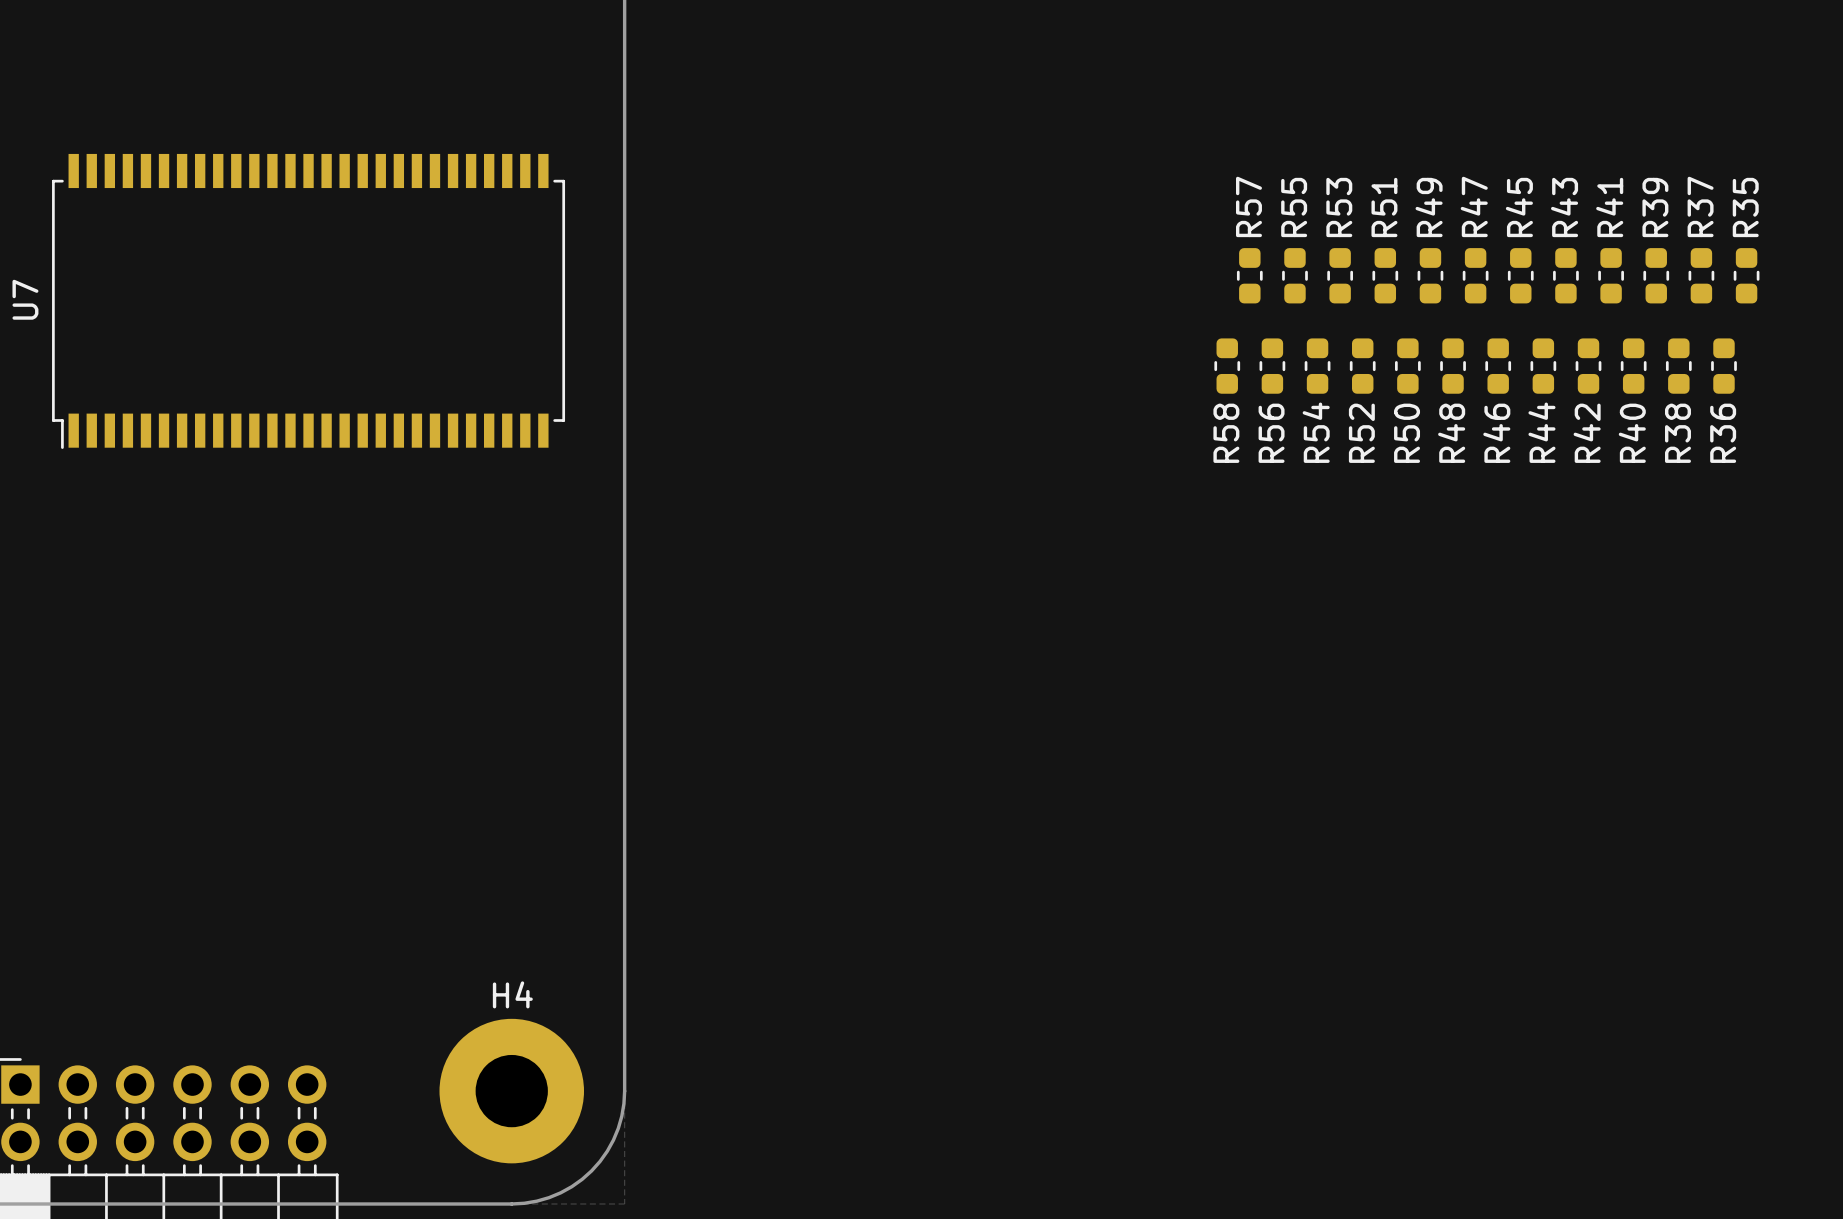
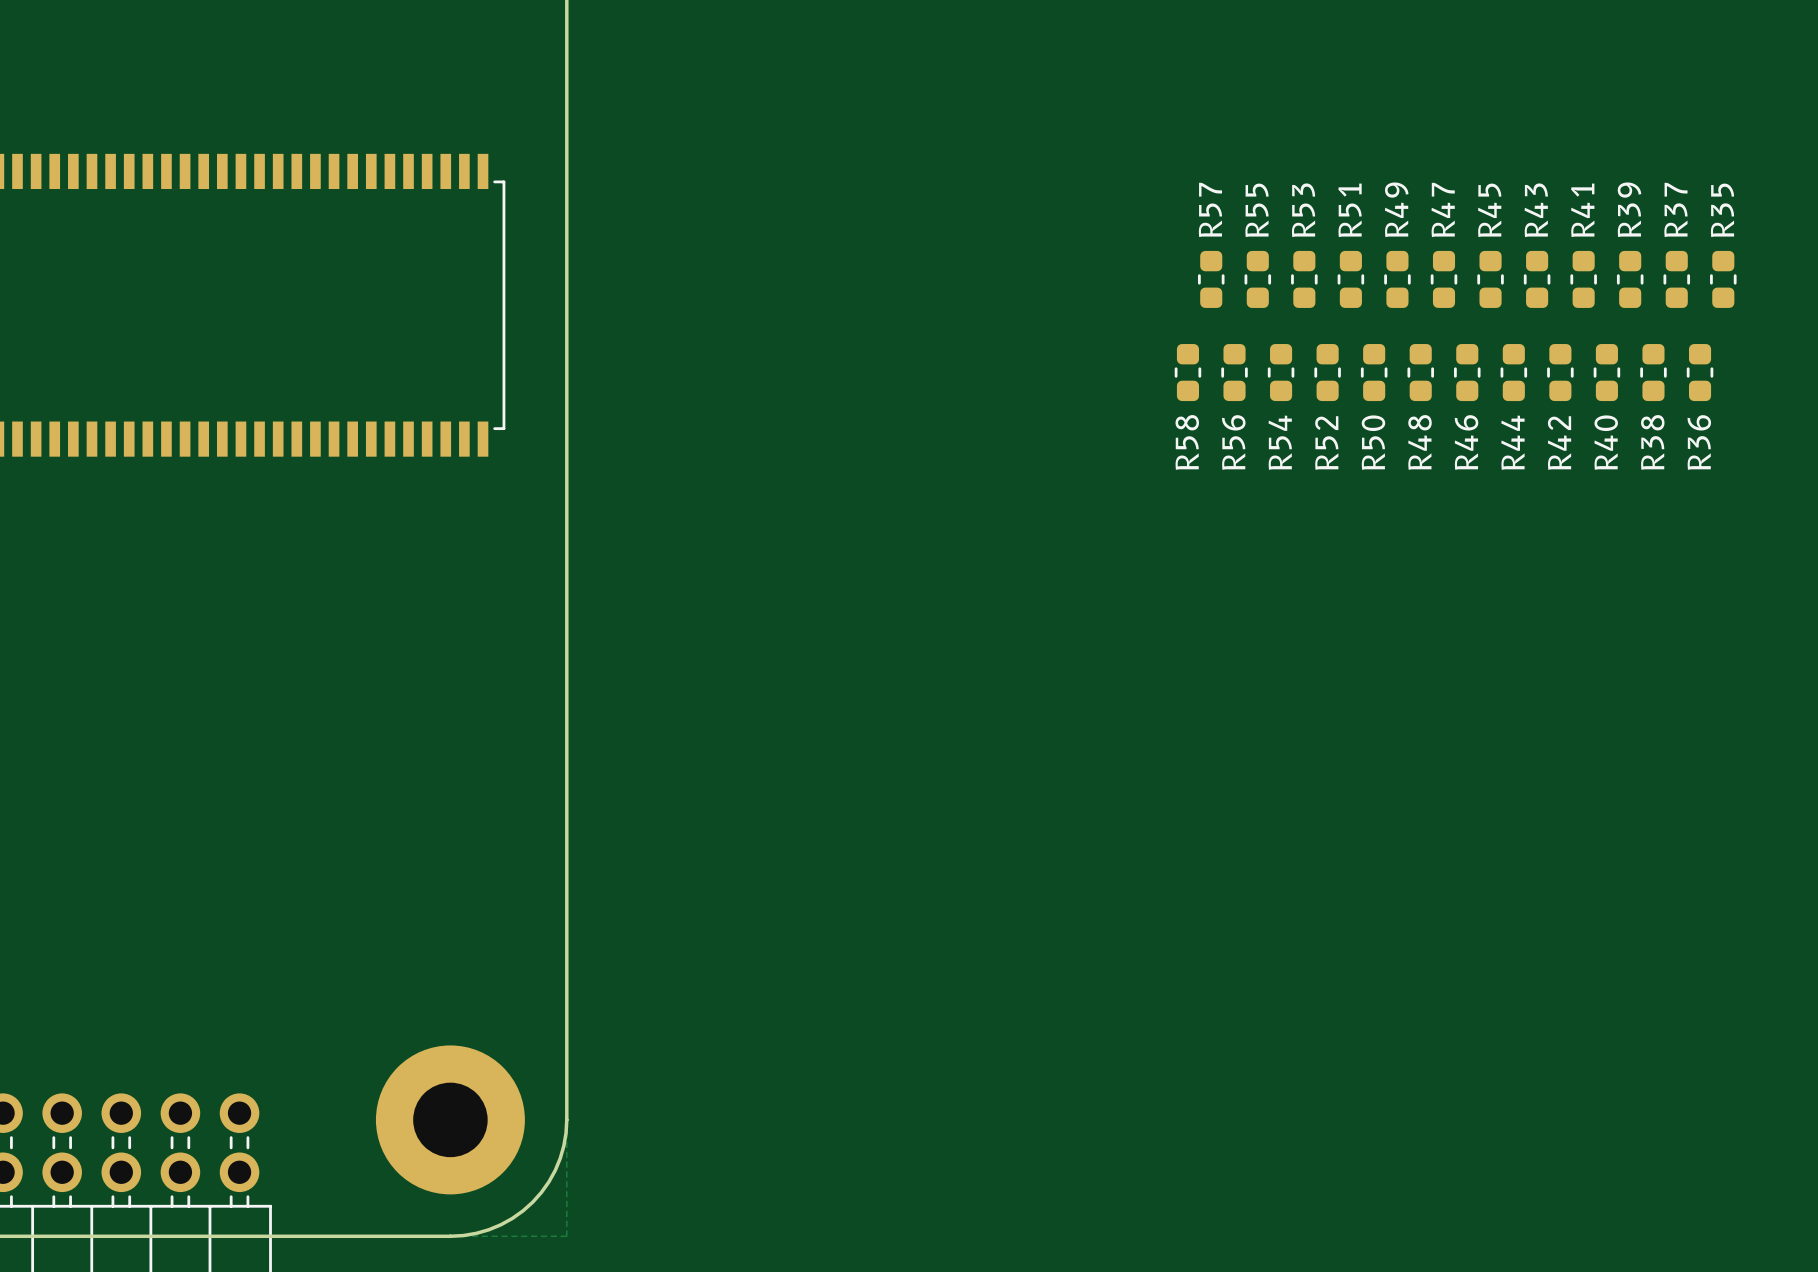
H4 name: H4 (512, 994) -> none

